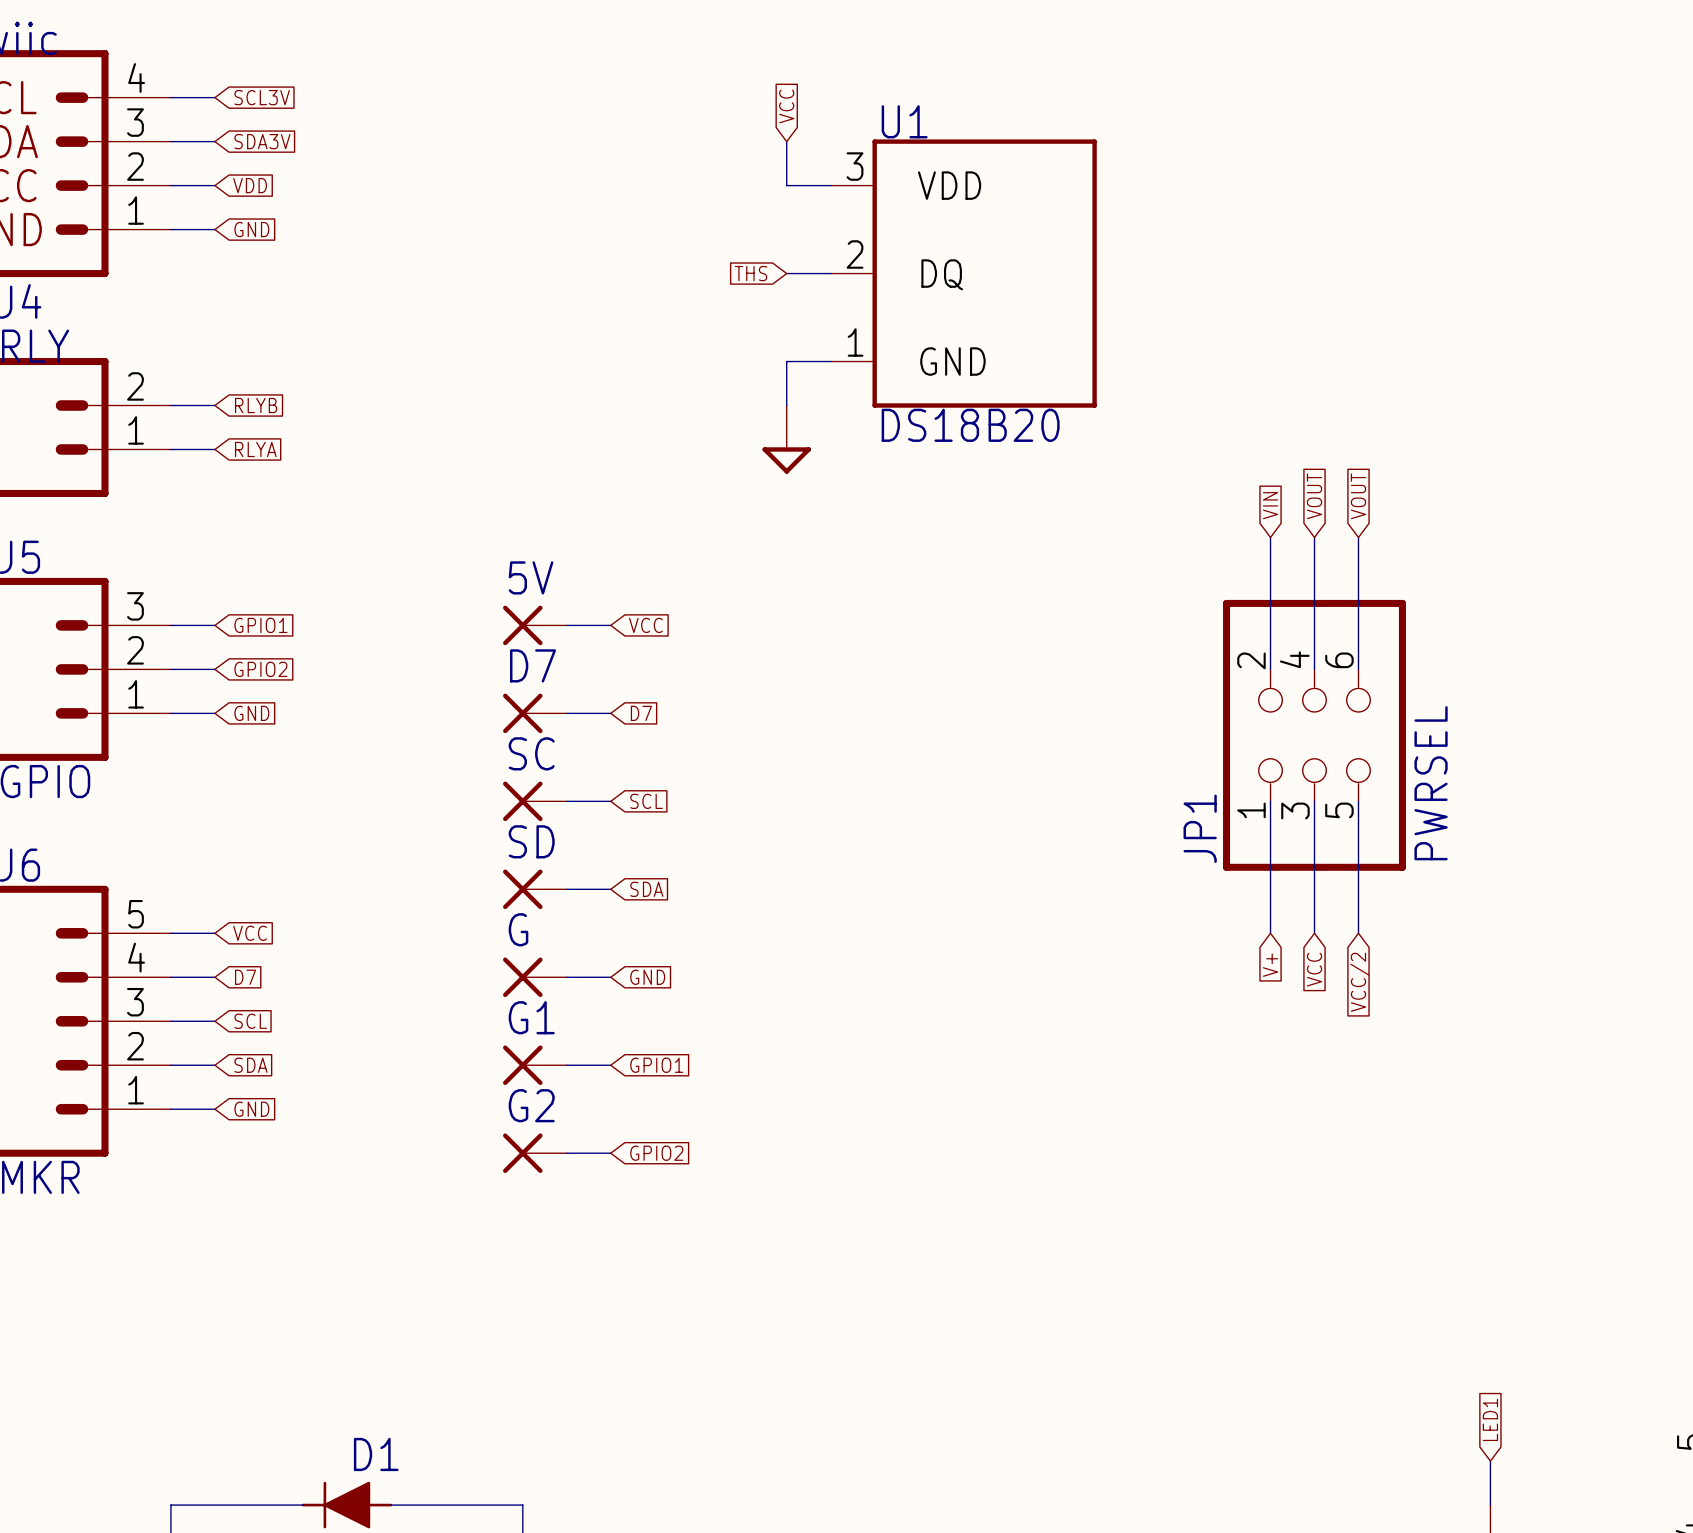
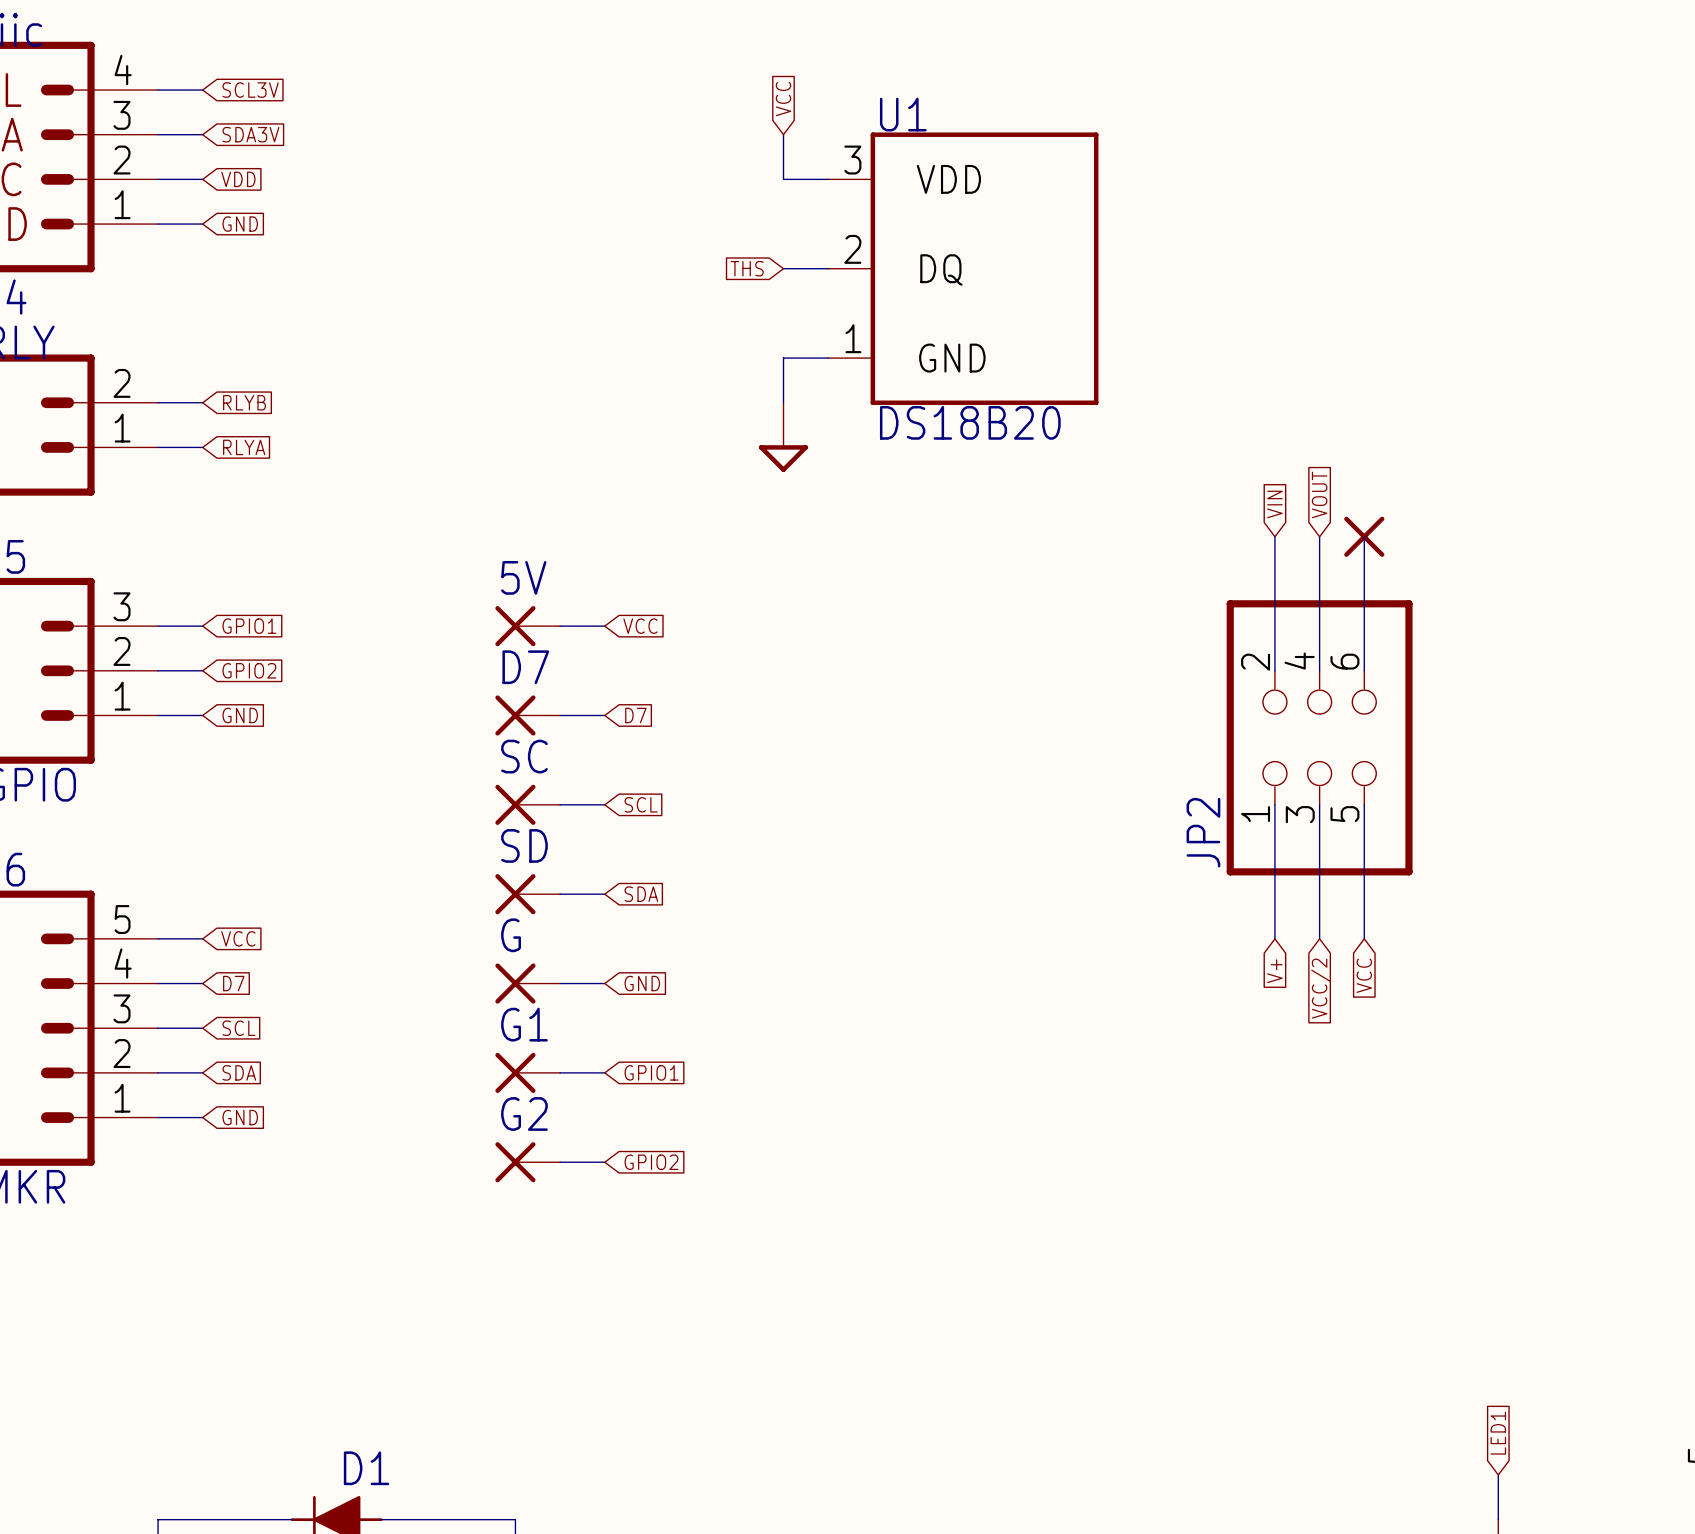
global label: VOUT (1358, 496) -> none
part: none -> (1364, 536)
JP1 value: PWRSEL (1431, 783) -> none
JP1 name: JP1 (1200, 828) -> JP2 (1203, 832)
global label: VCC (1314, 969) -> VCC/2 (1320, 988)
global label: VCC/2 (1359, 982) -> VCC (1364, 975)

